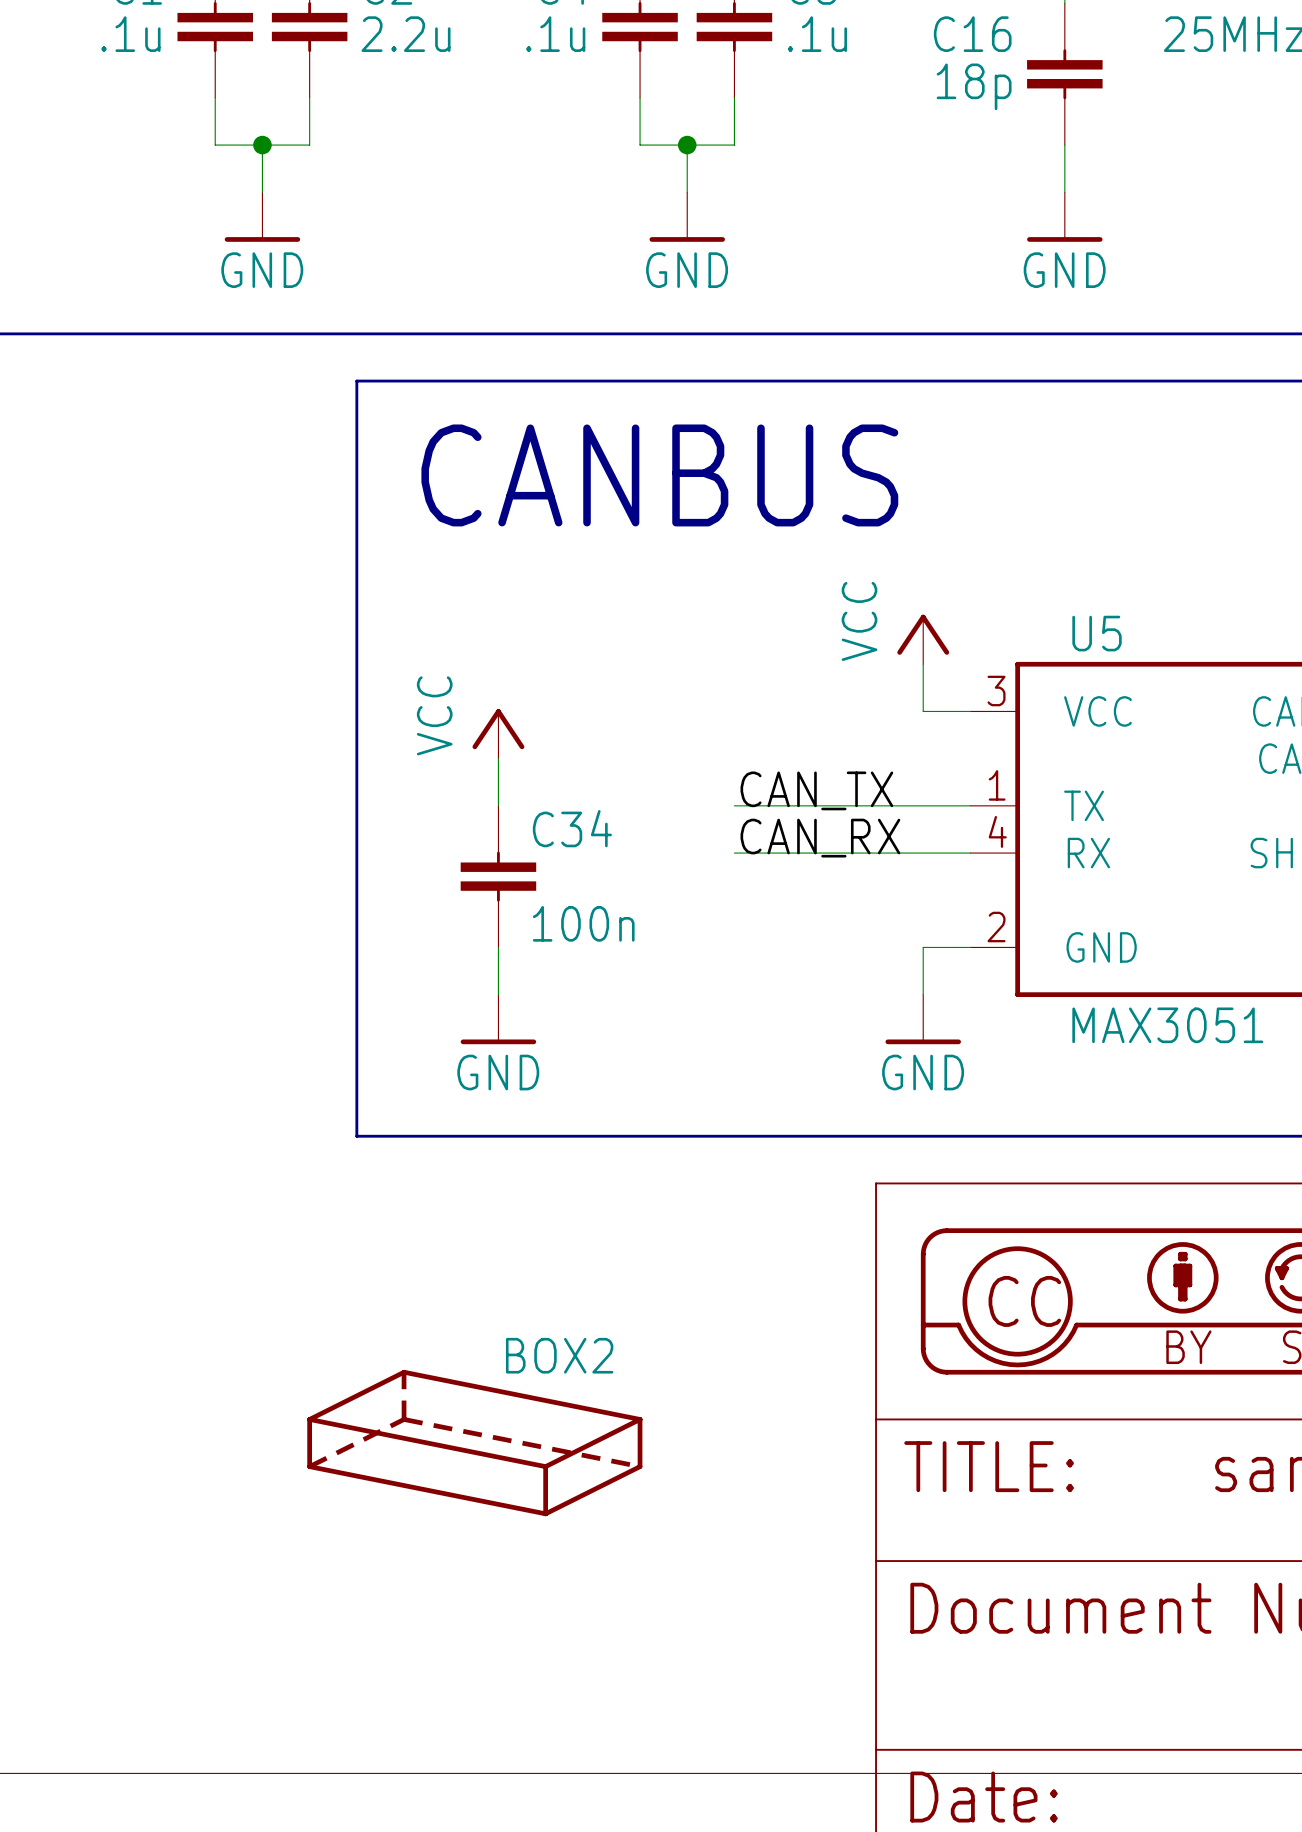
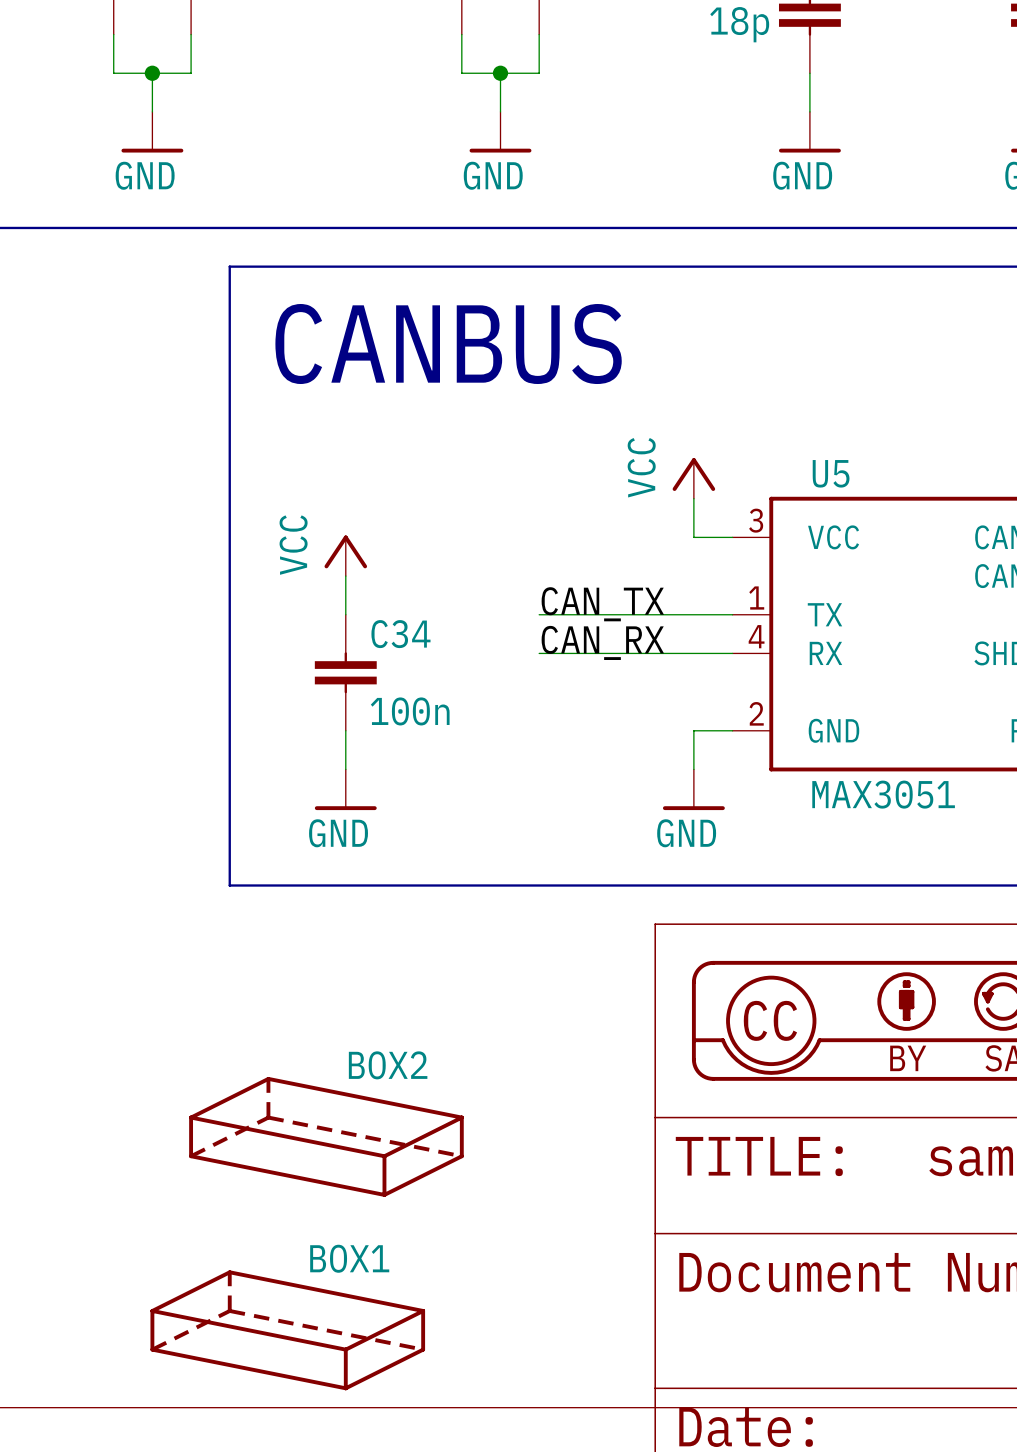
BOX1: none -> (287, 1330)

